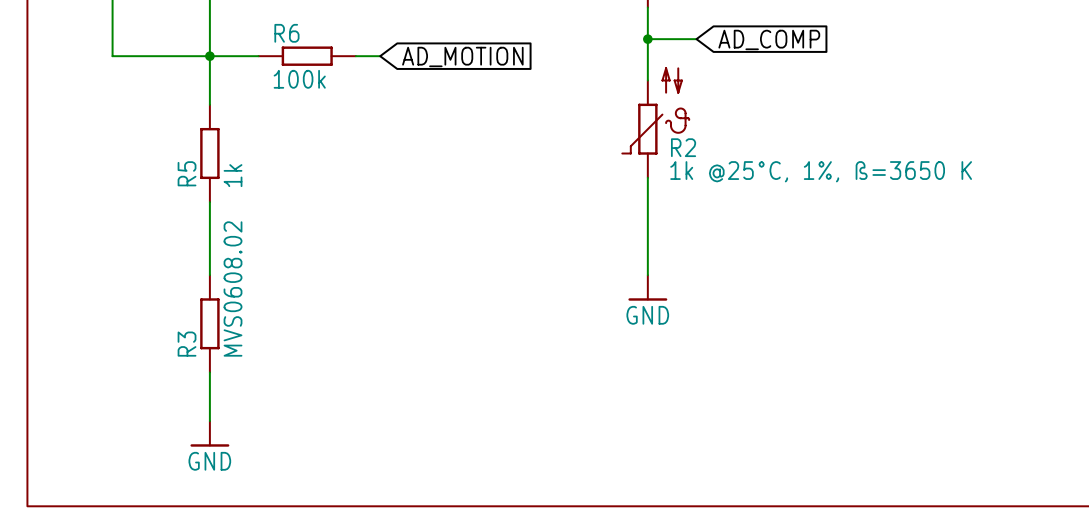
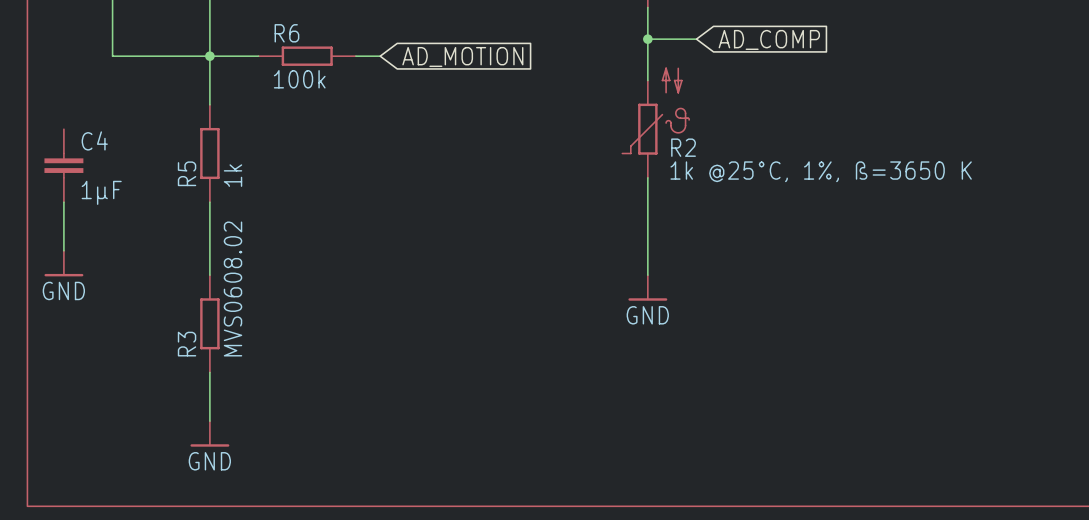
C4: none -> 1µF (63, 165)
wire: none -> (63, 202) (63, 250)
power symbol: none -> GND (63, 263)

